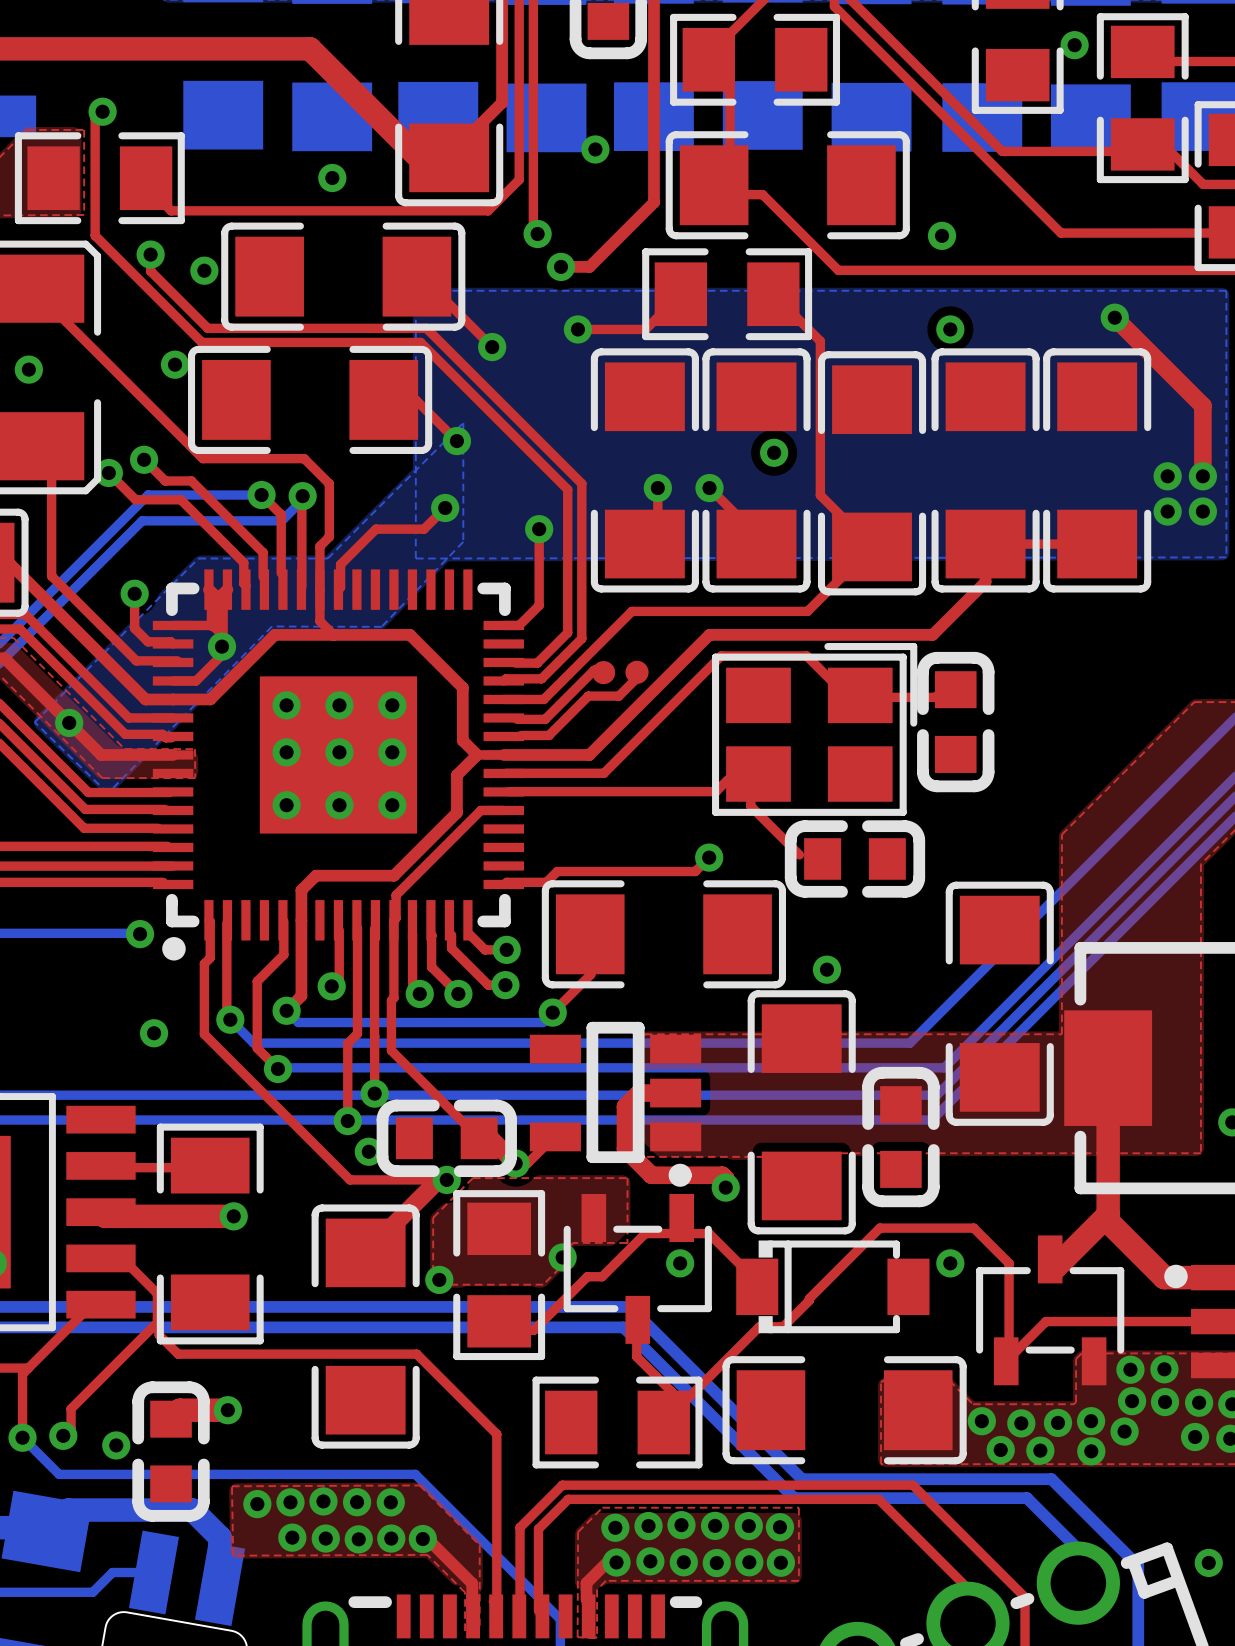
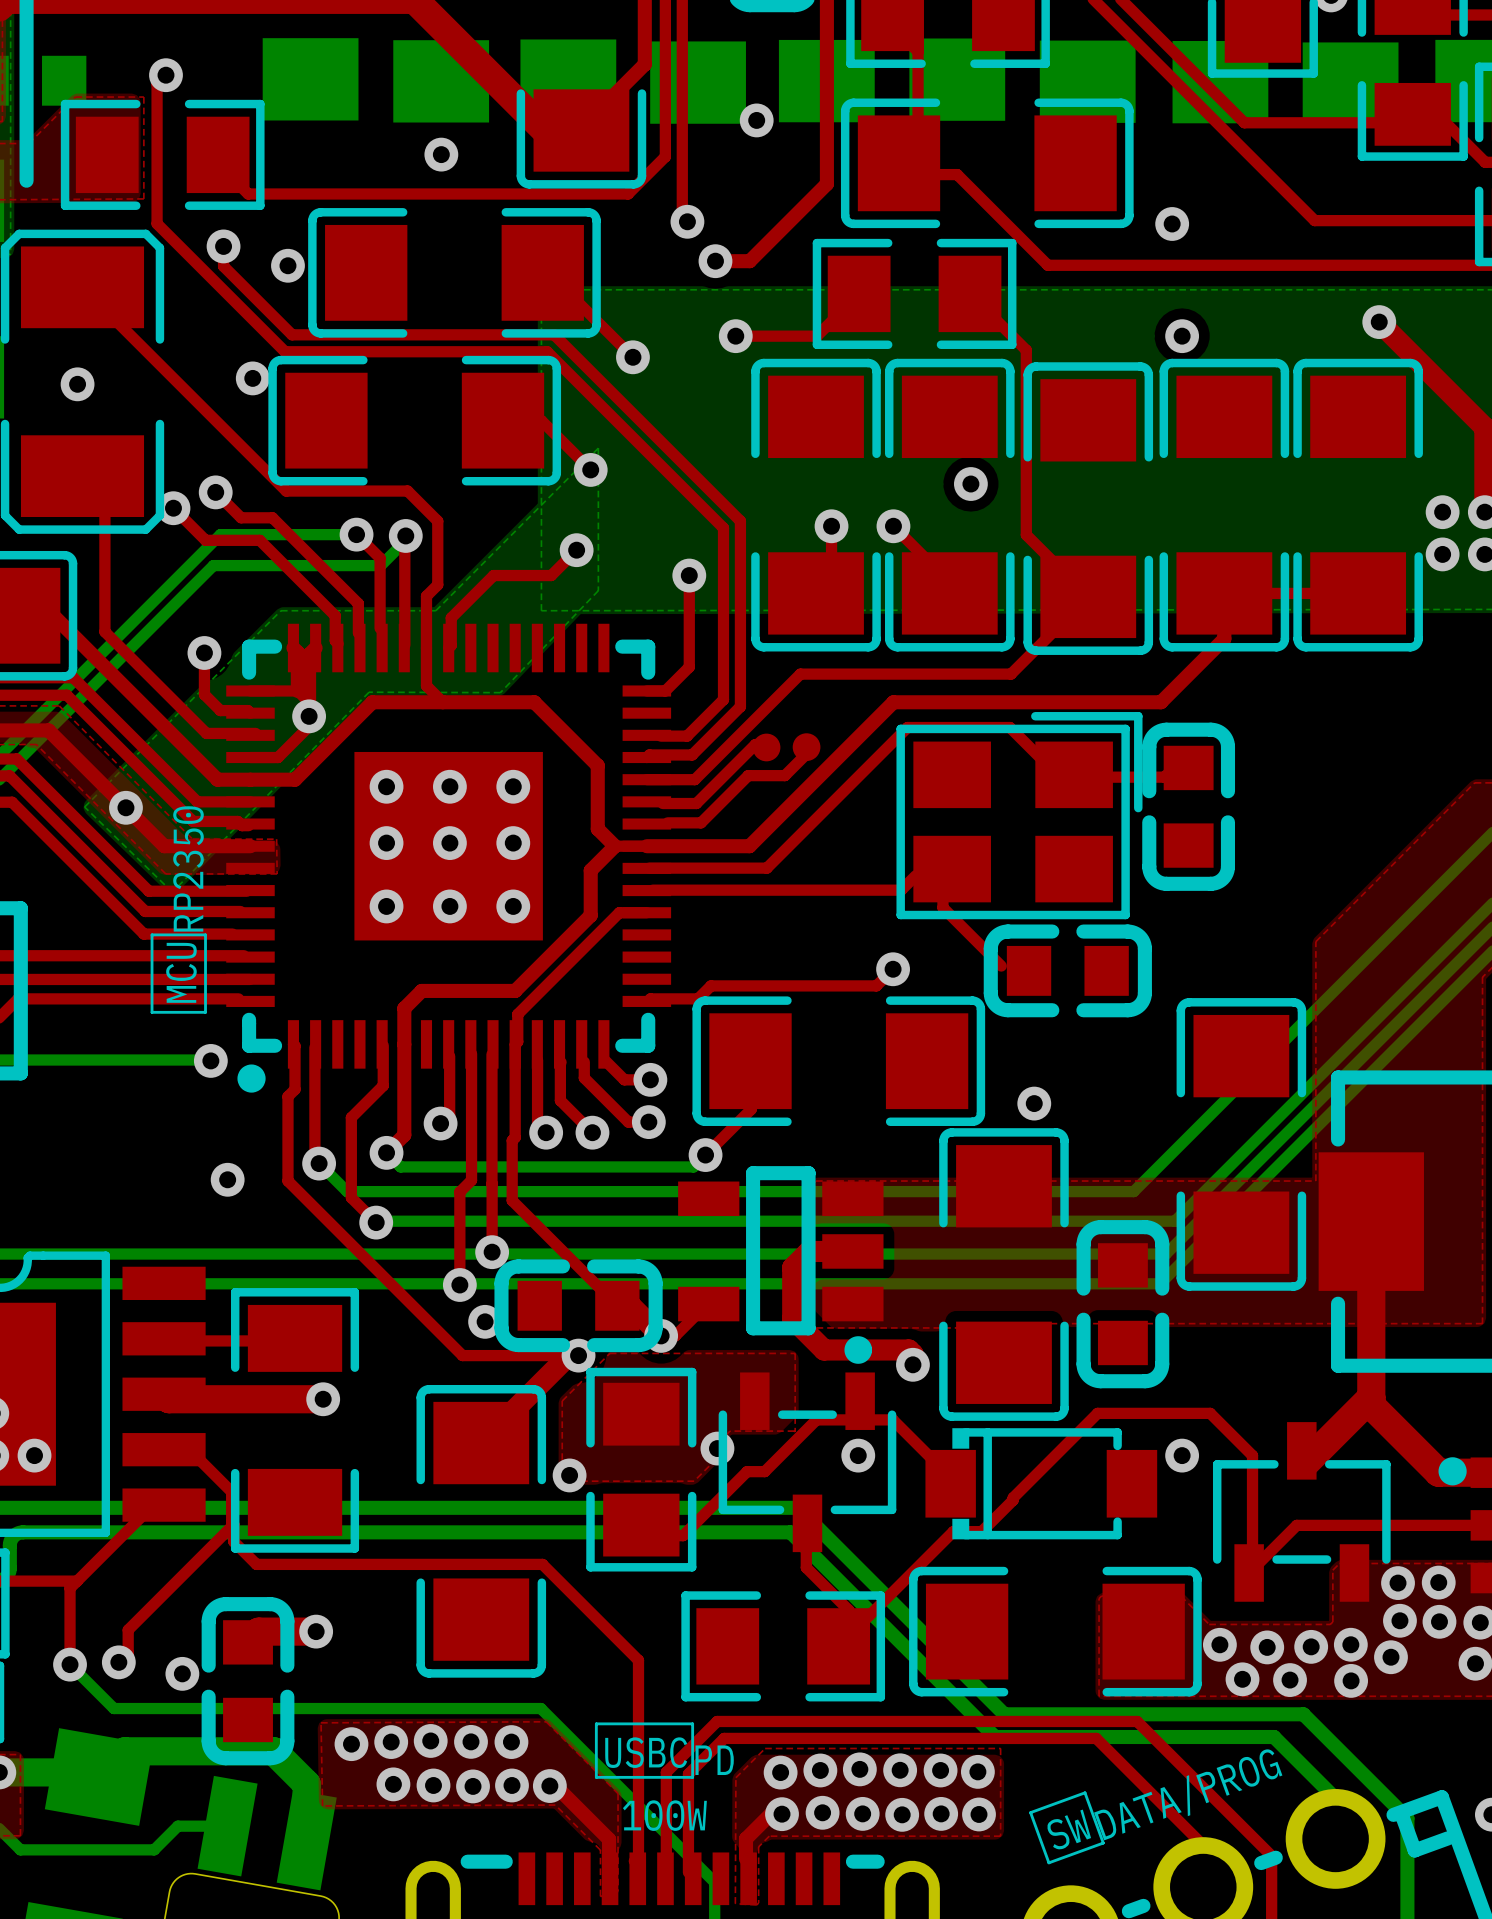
text: none -> RP2350 (188, 868)
line: none -> (152, 934) (205, 934) (205, 1012) (152, 1012) (152, 934)
text: none -> MCU (181, 972)
line: none -> (596, 1723) (692, 1723) (692, 1777) (596, 1777) (596, 1723)
text: none -> USBC (646, 1752)
text: none -> PD (714, 1760)
text: none -> DATA/PROG (1188, 1794)
line: none -> (1085, 1792) (1030, 1812) (1048, 1862) (1103, 1843) (1085, 1792)
text: none -> 100W (664, 1815)
text: none -> SW (1068, 1829)

